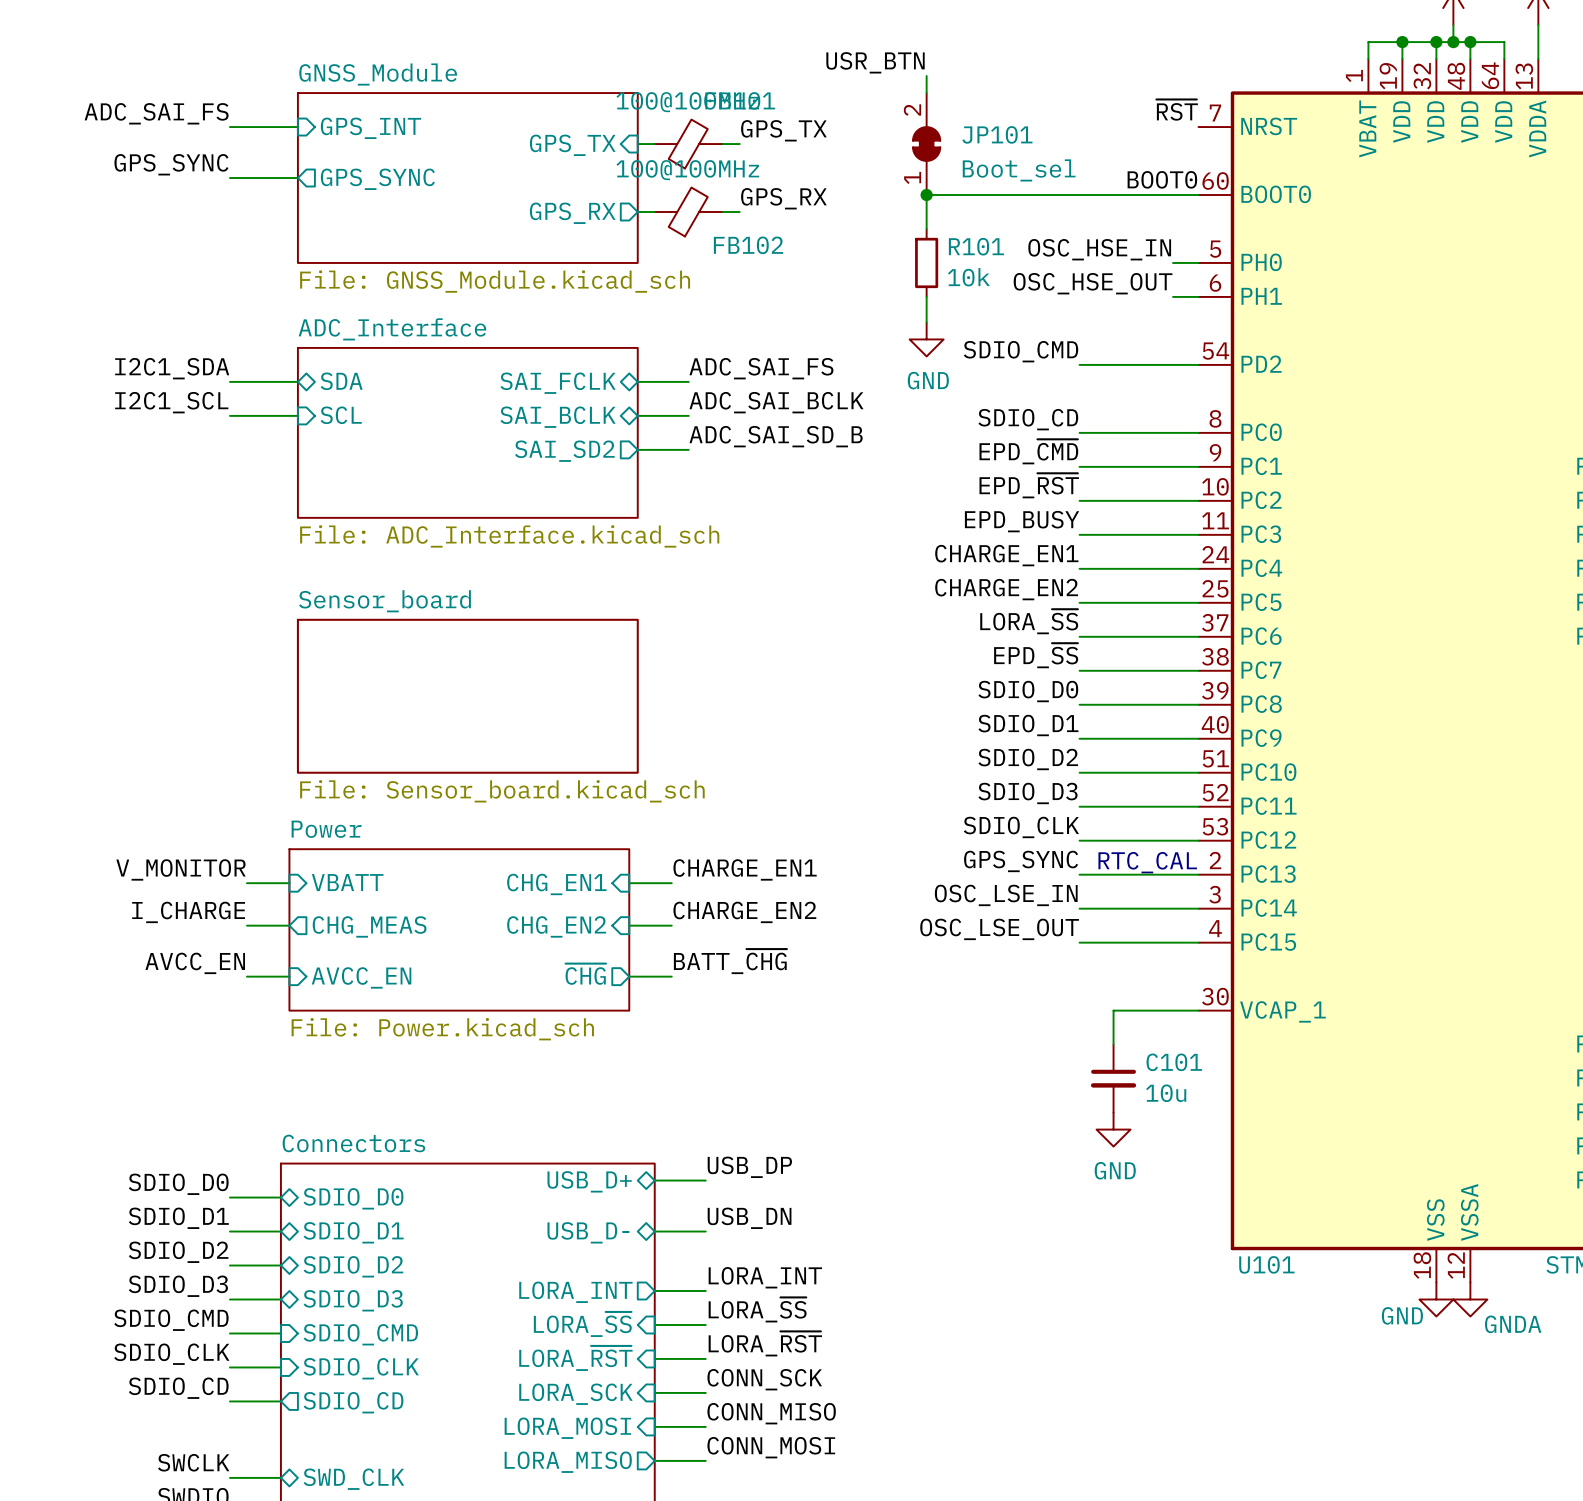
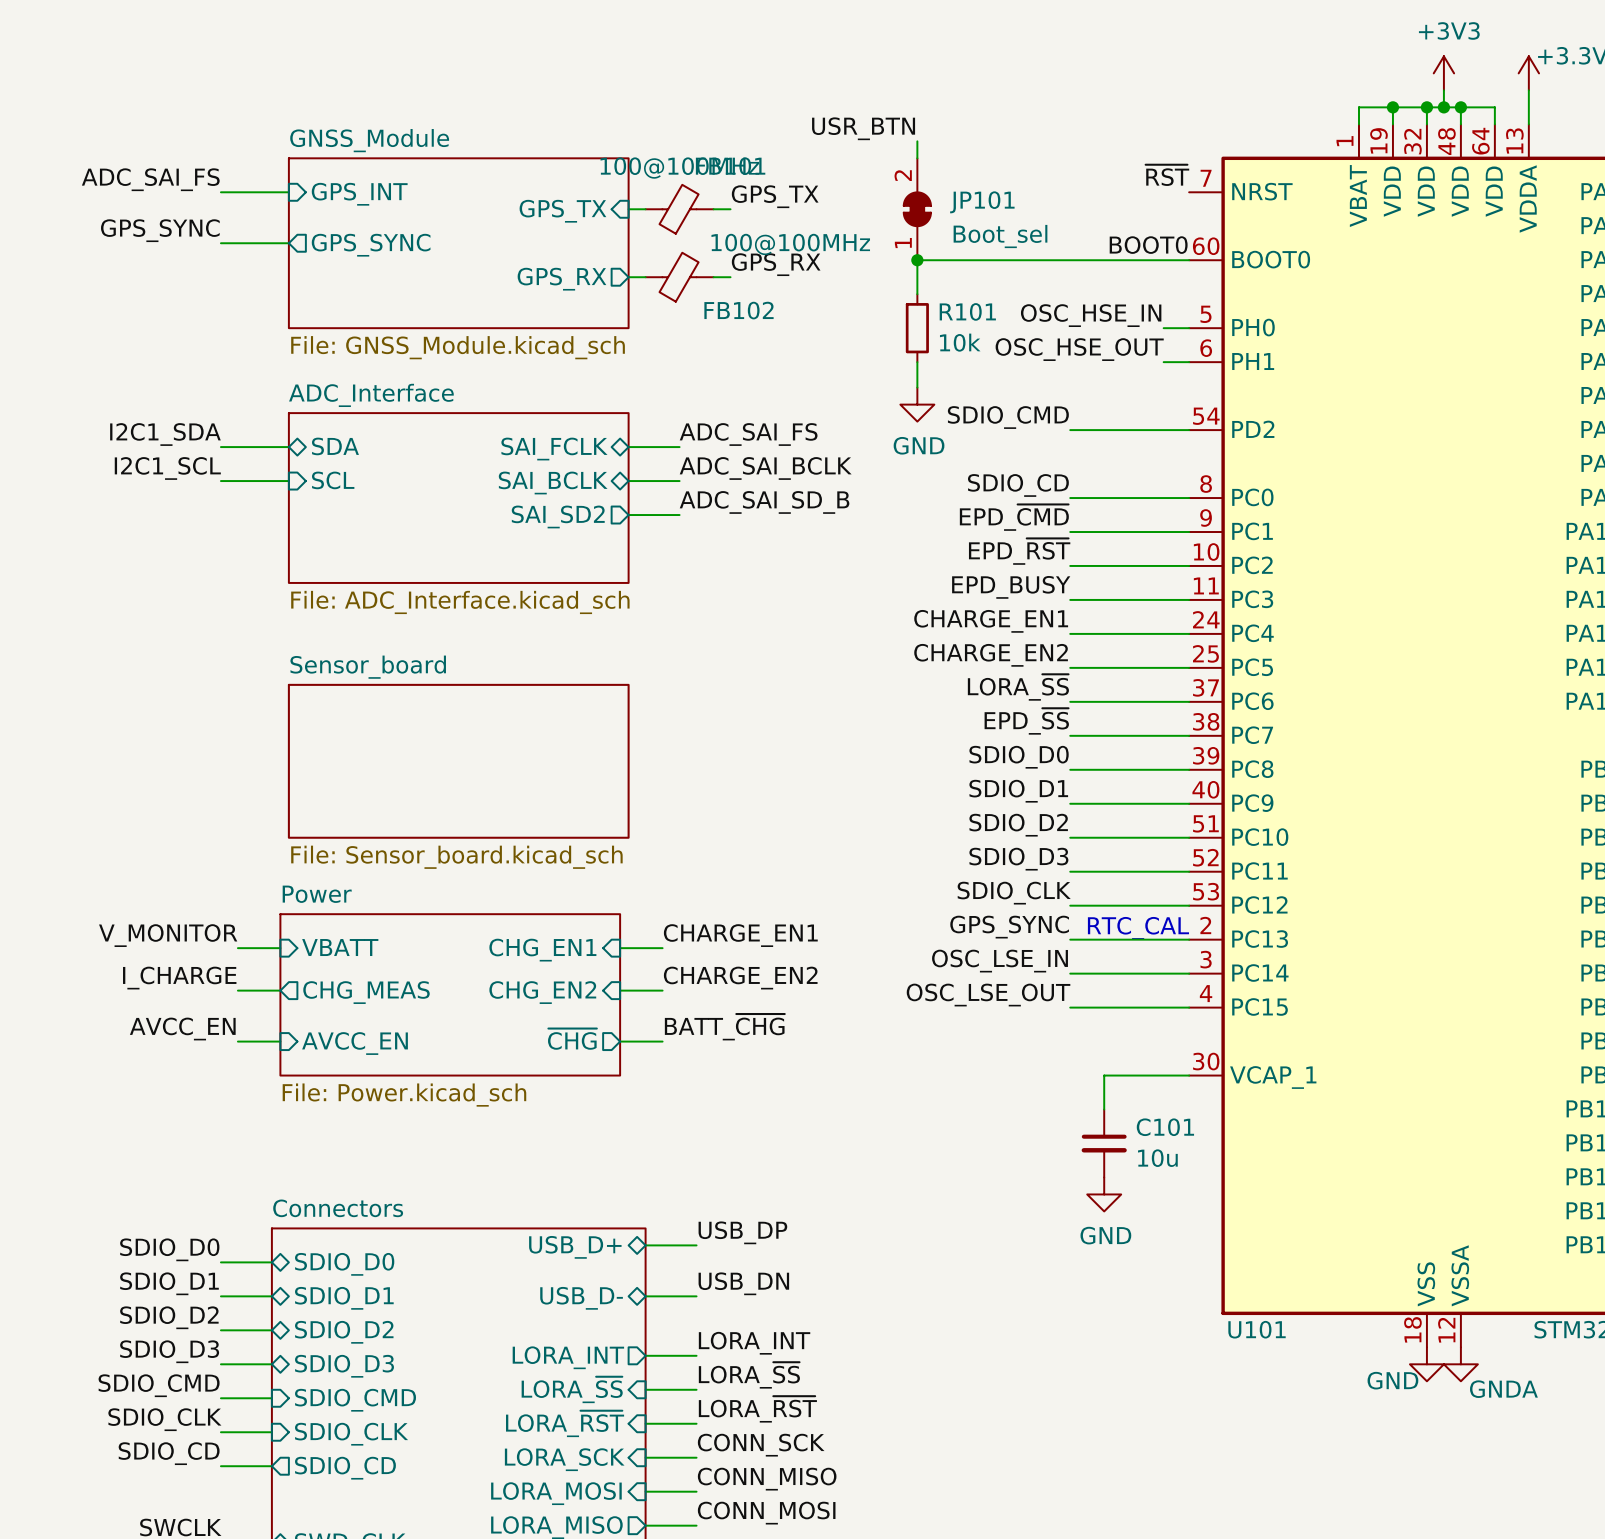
FB102 value position: 100@100MHz (687, 170) -> 100@100MHz (790, 244)

